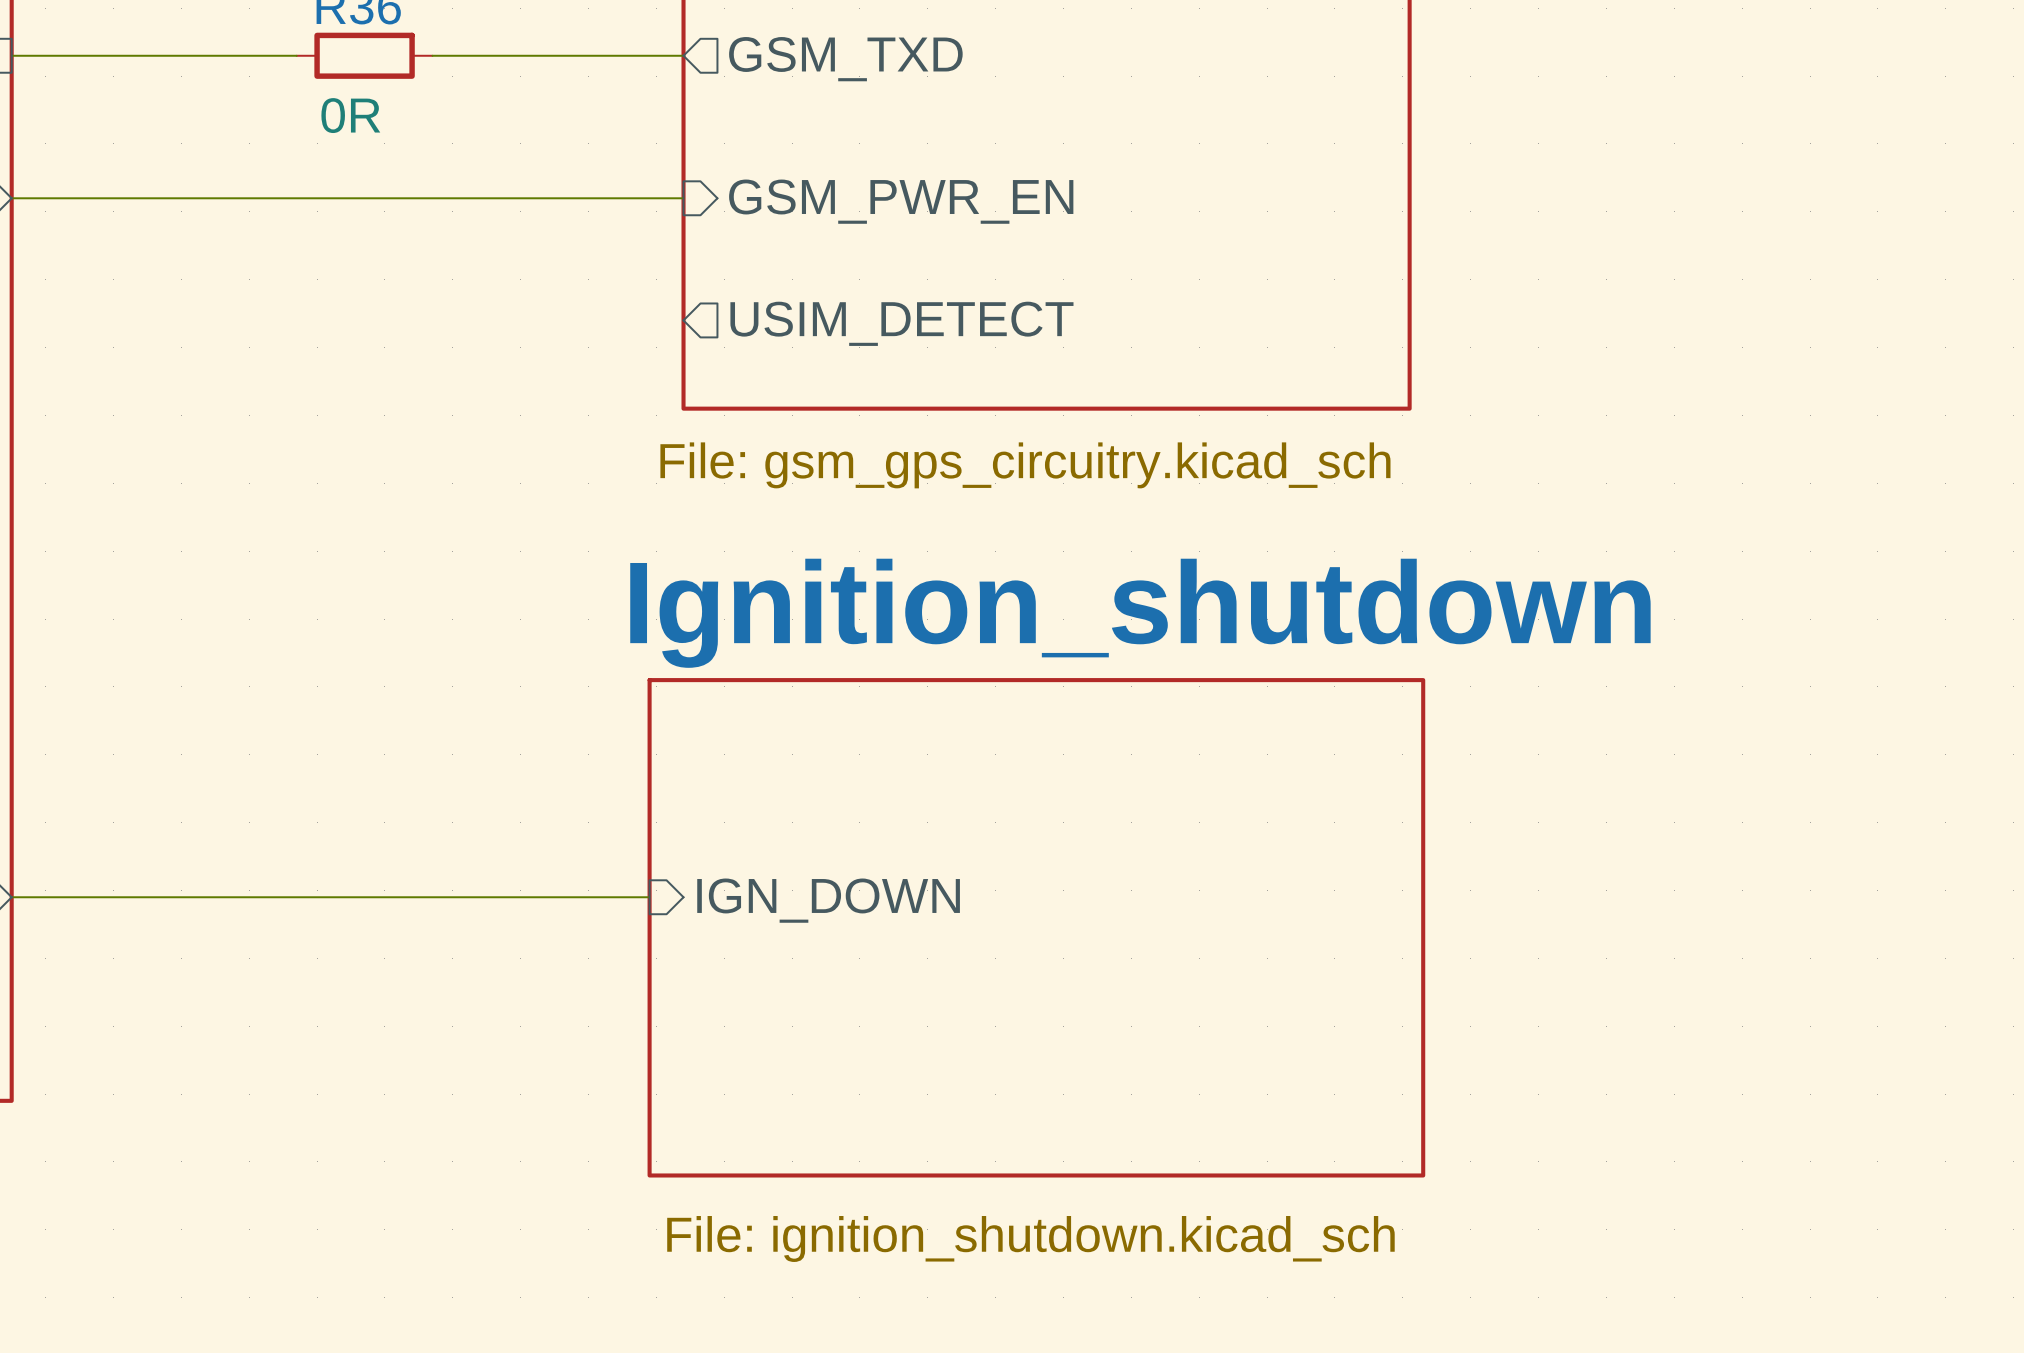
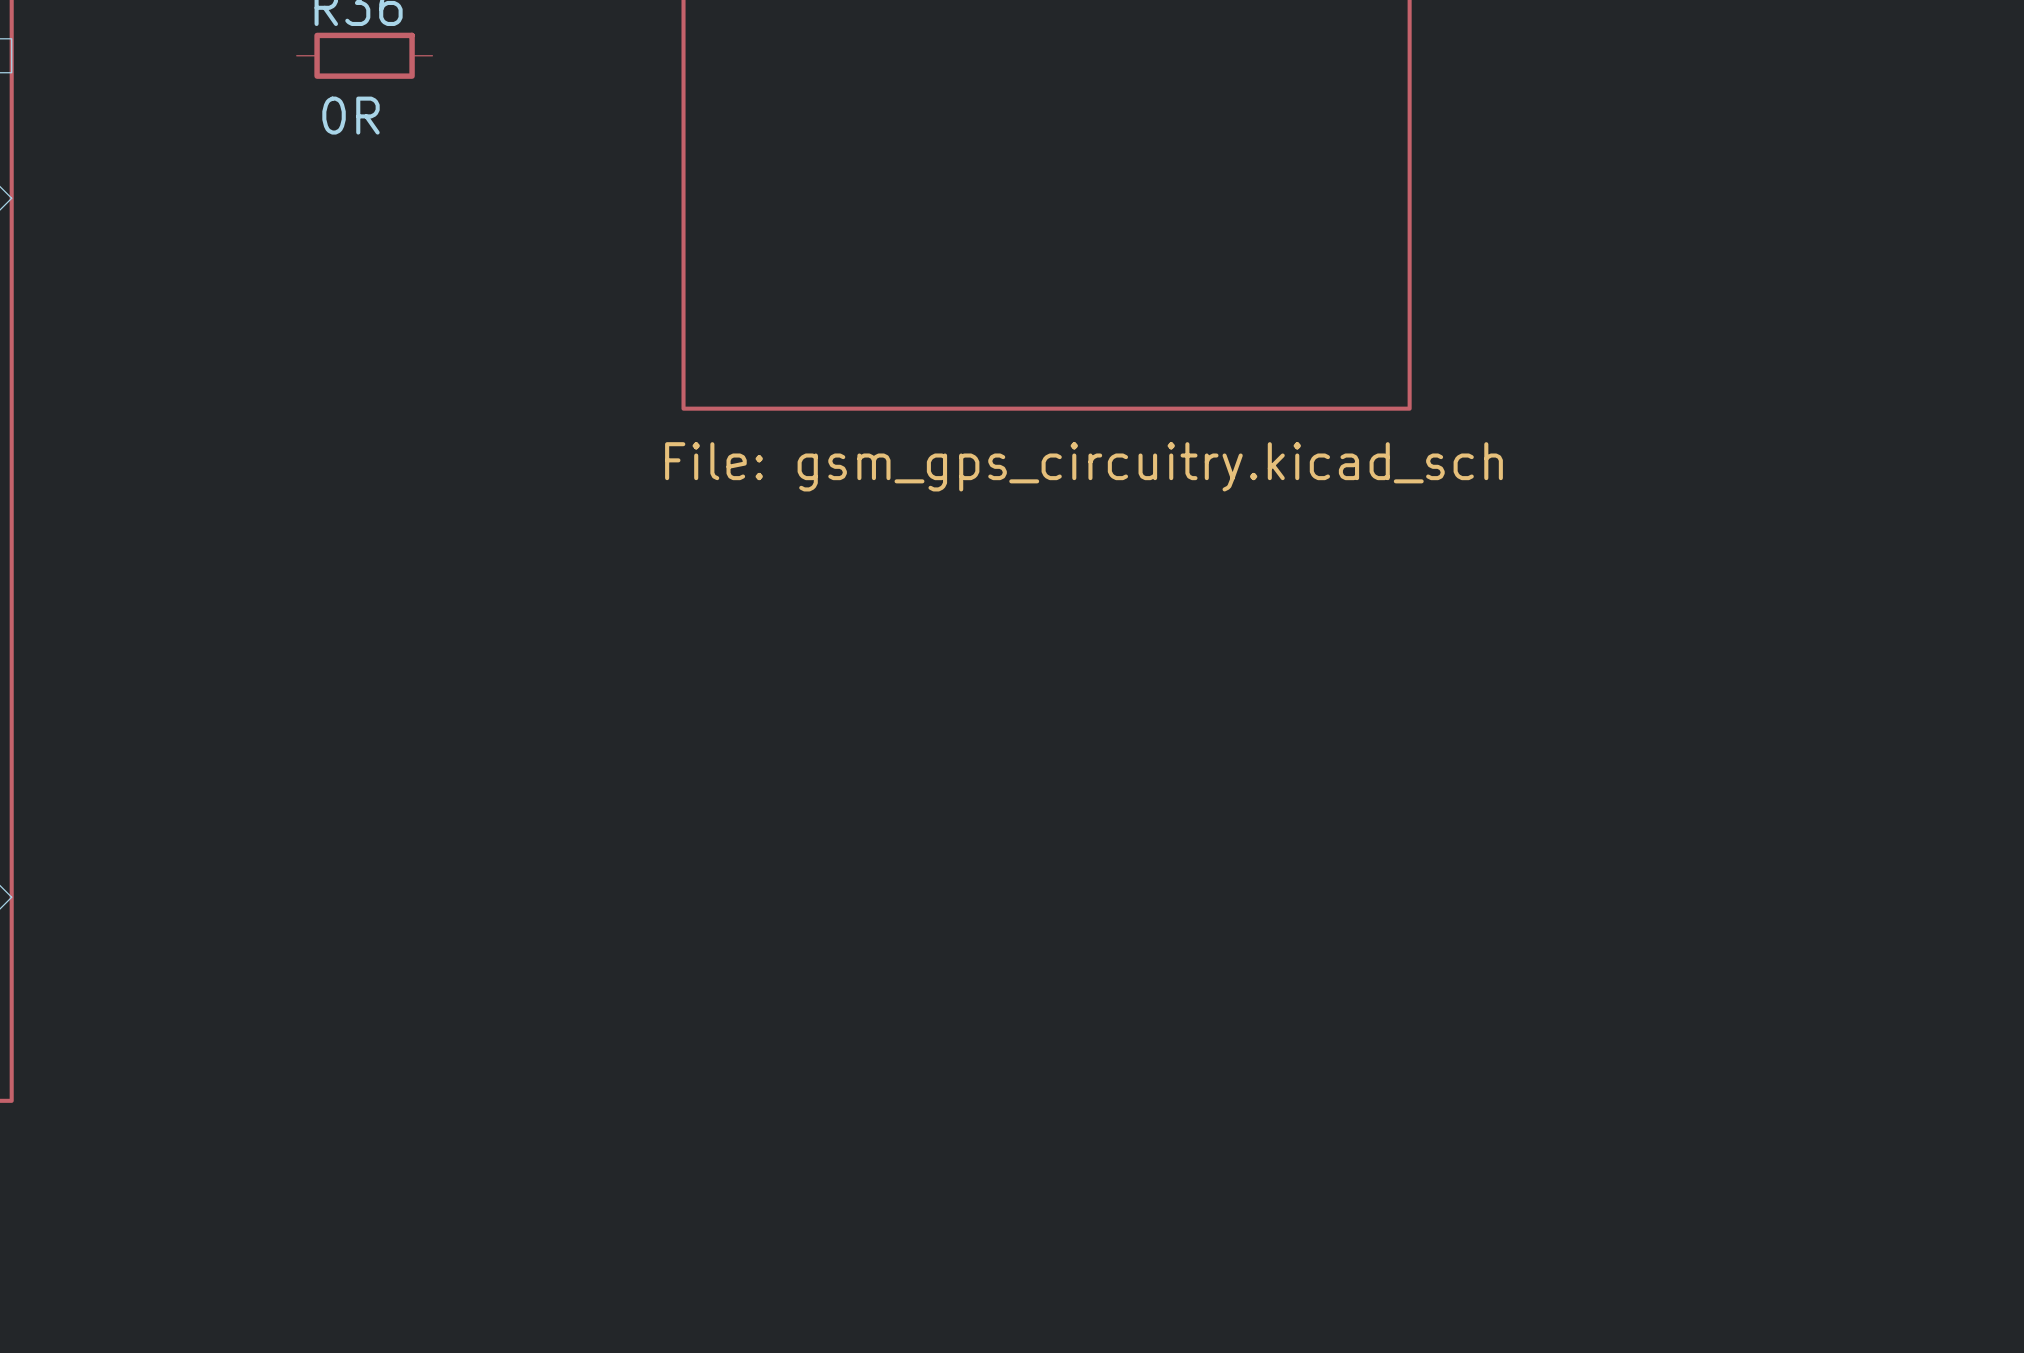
wire: (11, 55) (296, 55) -> none
wire: (432, 55) (683, 55) -> none
sheet pin: GSM_TXD (845, 59) -> none
wire: (11, 198) (683, 198) -> none
sheet pin: GSM_PWR_EN (901, 201) -> none
sheet pin: USIM_DETECT (901, 323) -> none
wire: (11, 897) (649, 897) -> none
sheet pin: IGN_DOWN (828, 900) -> none
sheet Ignition_shutdown: File: ignition_shutdown.kicad_sch (1036, 927) -> none

